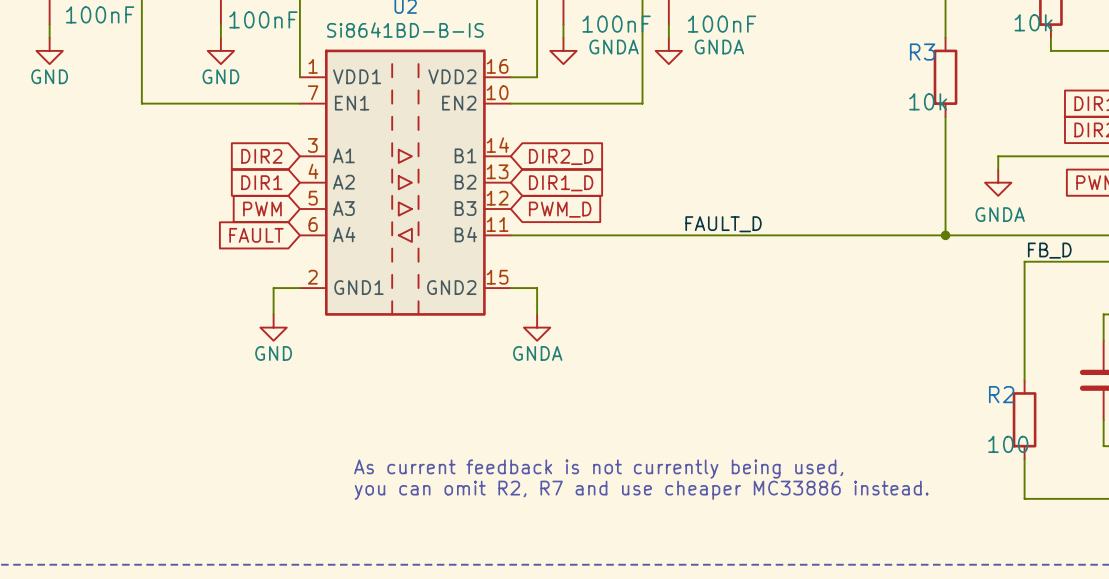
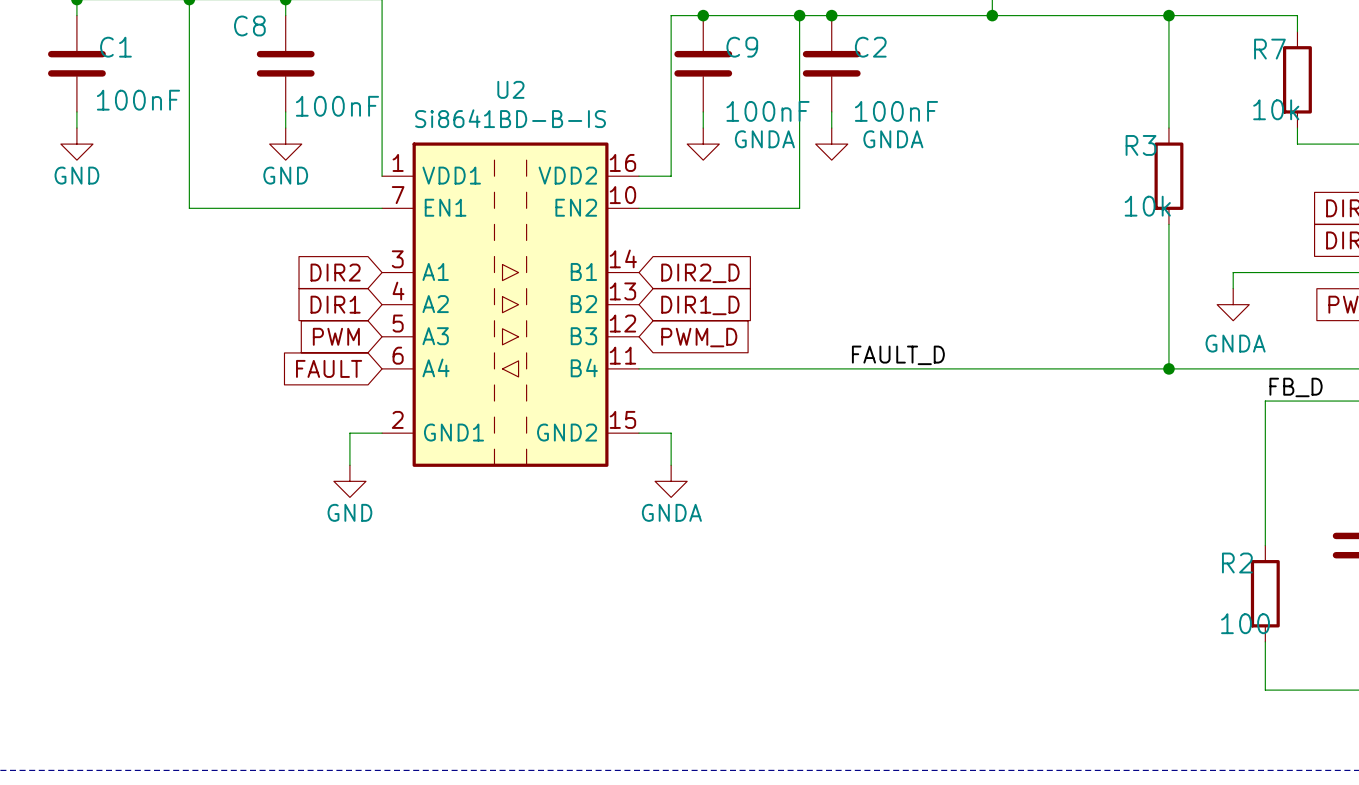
text: As current feedback is not currently being used, (598, 469) -> none
text: you can omit R2, R7 and use cheaper MC33886 instead. (641, 490) -> none

